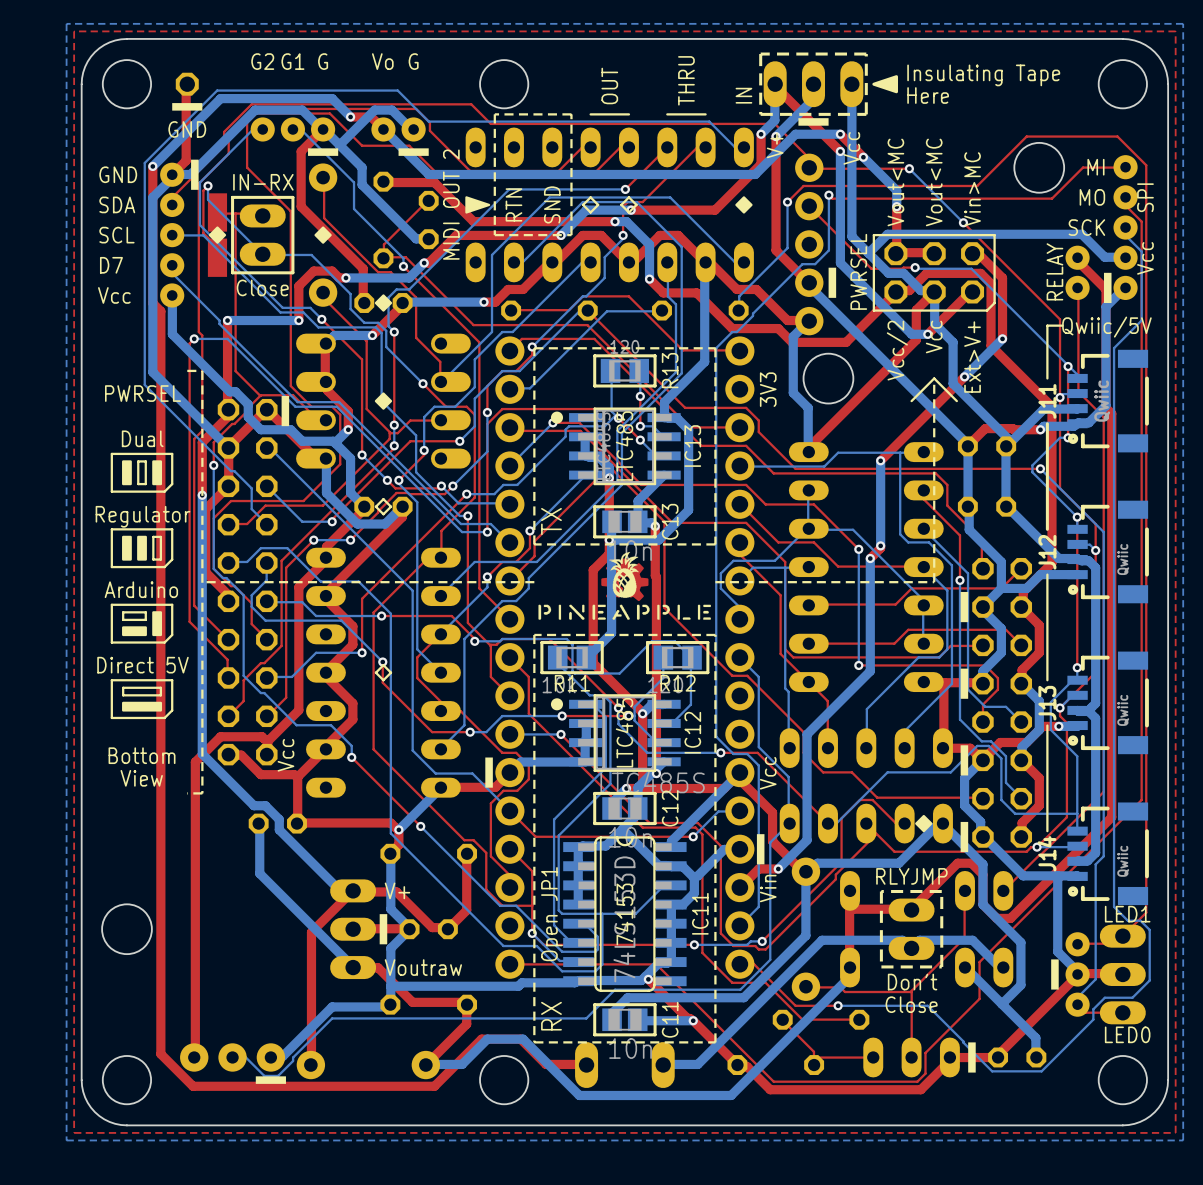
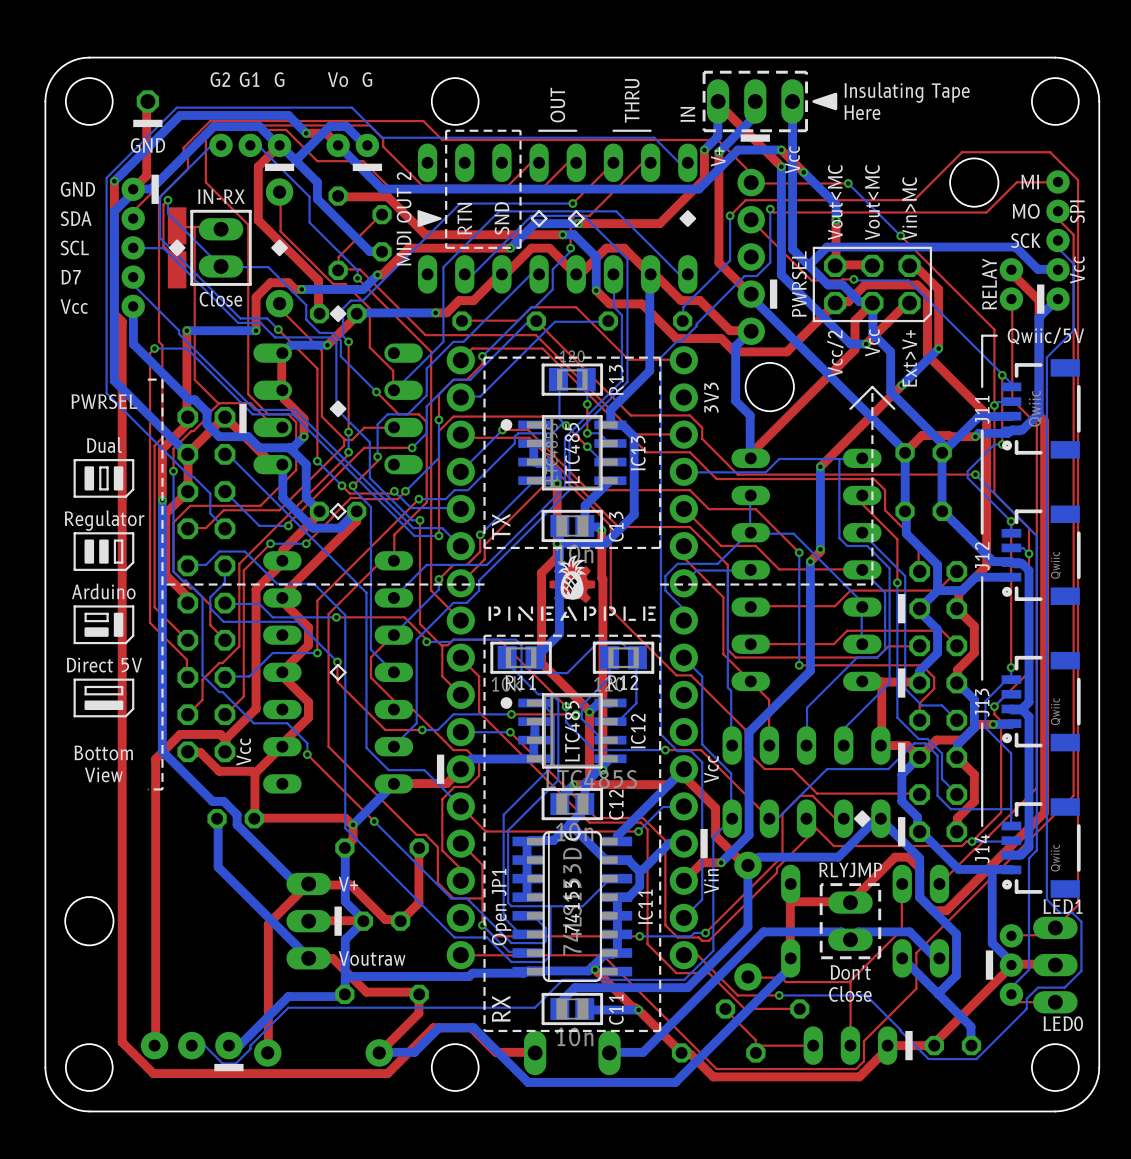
bottom zone outline: (1183, 23) (66, 23) (66, 1140) (1183, 1140) (1183, 23) -> none
top zone outline: (1175, 31) (74, 31) (74, 1132) (1175, 1132) (1175, 31) -> none

